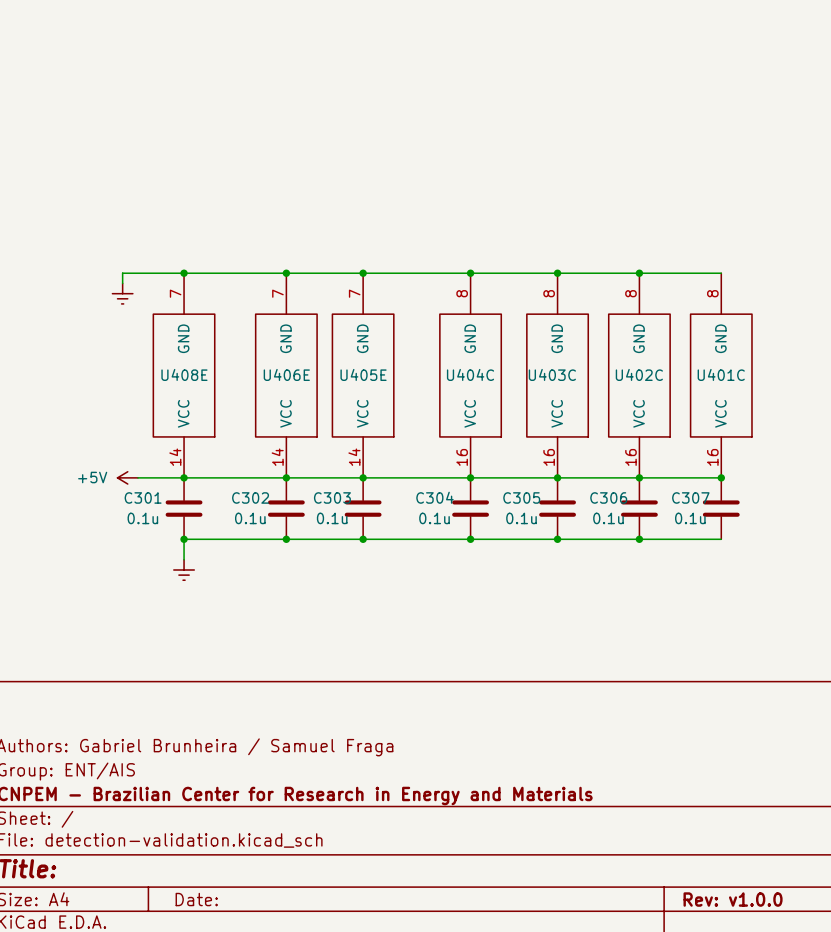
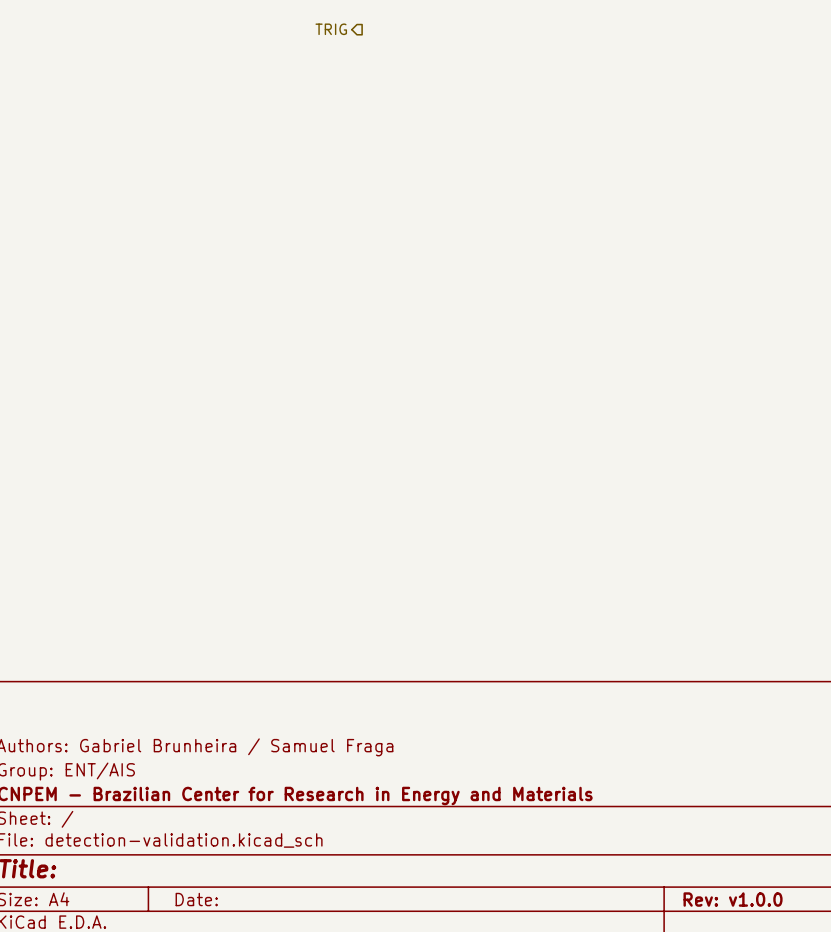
hierarchical label: none -> TRIG (331, 29)
junction: (184, 273) -> none
junction: (286, 273) -> none
junction: (363, 273) -> none
junction: (470, 273) -> none
junction: (557, 273) -> none
junction: (639, 273) -> none
wire: (721, 273) (122, 273) (122, 283) -> none
power symbol: (122, 293) -> none
U408E: (184, 375) -> none
U406E: (286, 375) -> none
U405E: (363, 375) -> none
U404C: (470, 375) -> none
U403C: (557, 375) -> none
U402C: (639, 375) -> none
U401C: (721, 375) -> none
power symbol: +5V (127, 477) -> none
wire: (137, 477) (721, 477) -> none
junction: (184, 477) -> none
junction: (286, 477) -> none
junction: (363, 477) -> none
junction: (470, 477) -> none
junction: (557, 477) -> none
junction: (639, 477) -> none
junction: (721, 477) -> none
C301: 0.1u (184, 508) -> none
C302: 0.1u (286, 508) -> none
C303: 0.1u (363, 508) -> none
C304: 0.1u (470, 508) -> none
C305: 0.1u (557, 508) -> none
C306: 0.1u (639, 508) -> none
C307: 0.1u (721, 508) -> none
junction: (184, 539) -> none
junction: (286, 539) -> none
junction: (363, 539) -> none
junction: (470, 539) -> none
junction: (557, 539) -> none
junction: (639, 539) -> none
wire: (721, 539) (184, 539) (184, 559) -> none
power symbol: (184, 569) -> none

